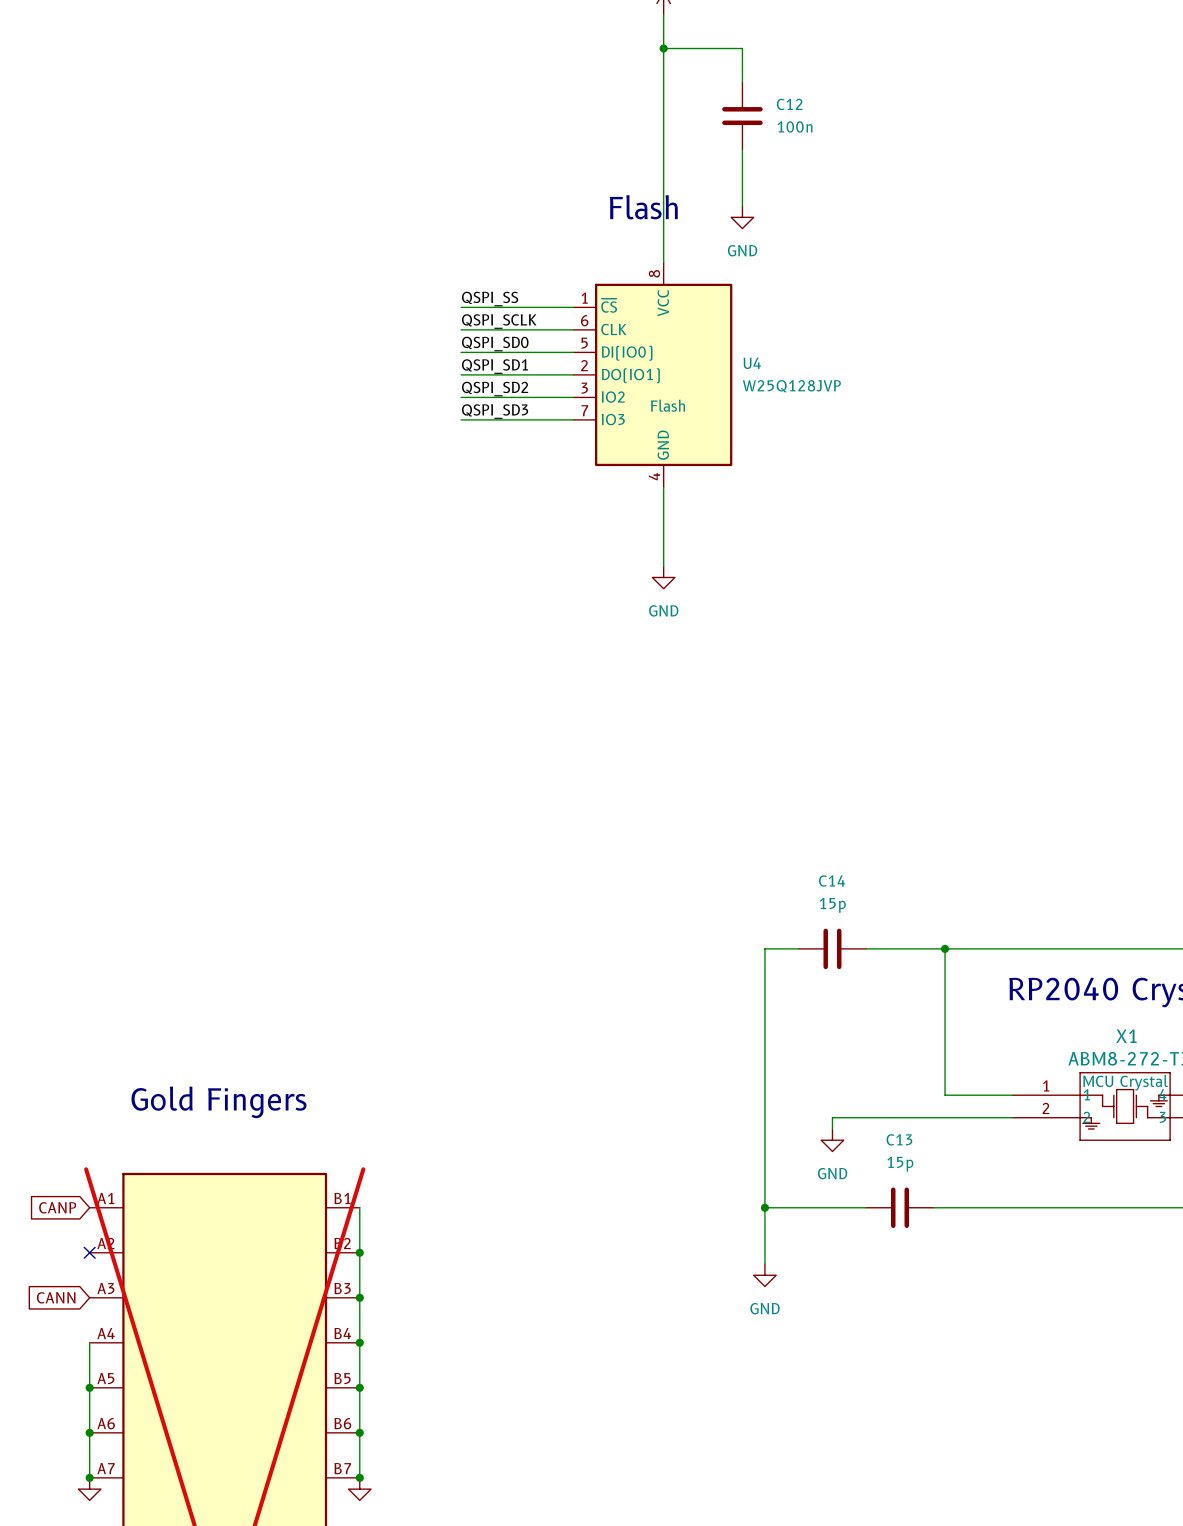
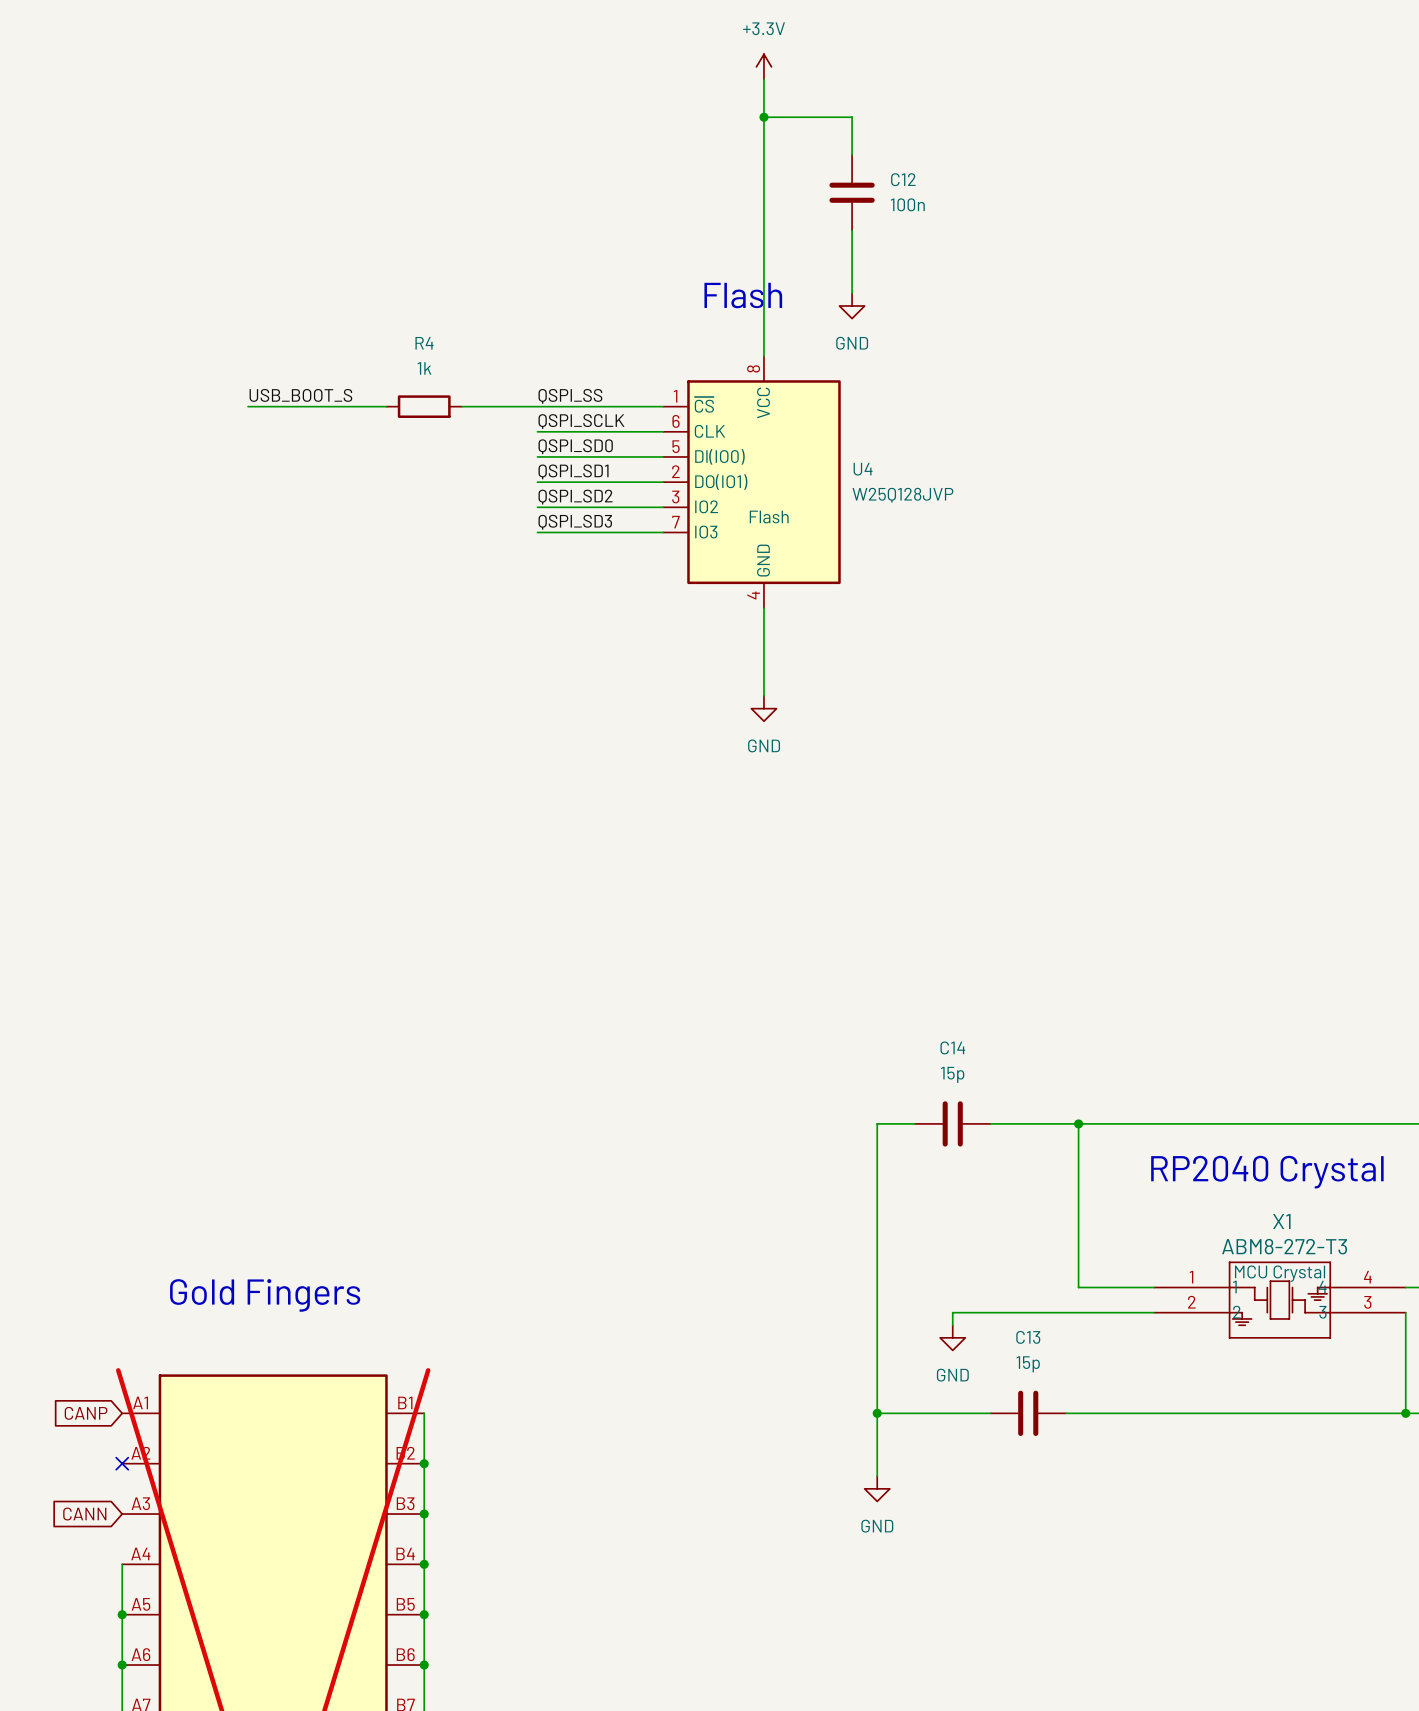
label: none -> USB_BOOT_S (300, 395)
wire: none -> (248, 406) (386, 406)
R4: none -> 1k (424, 406)
wire: none -> (461, 406) (537, 406)

